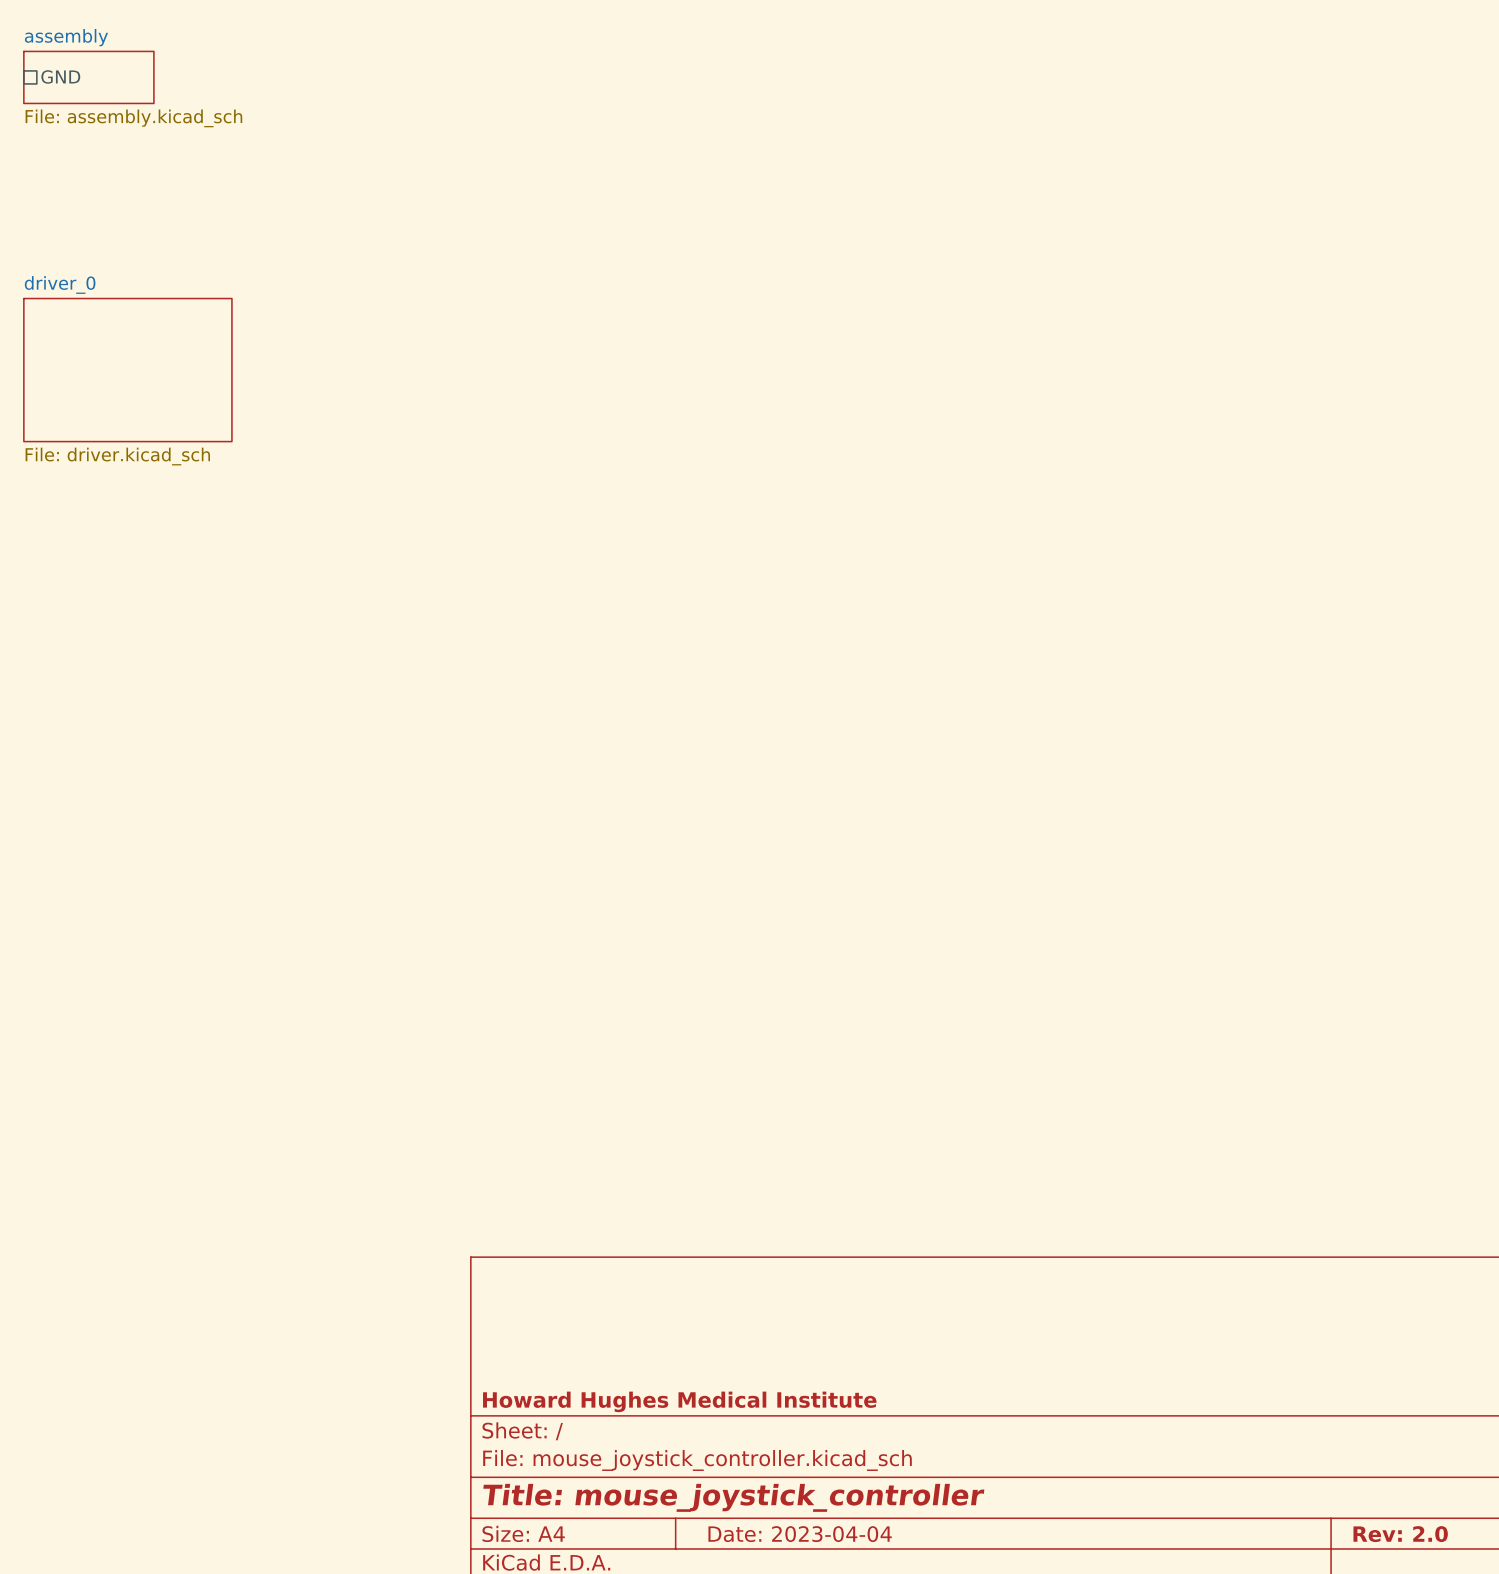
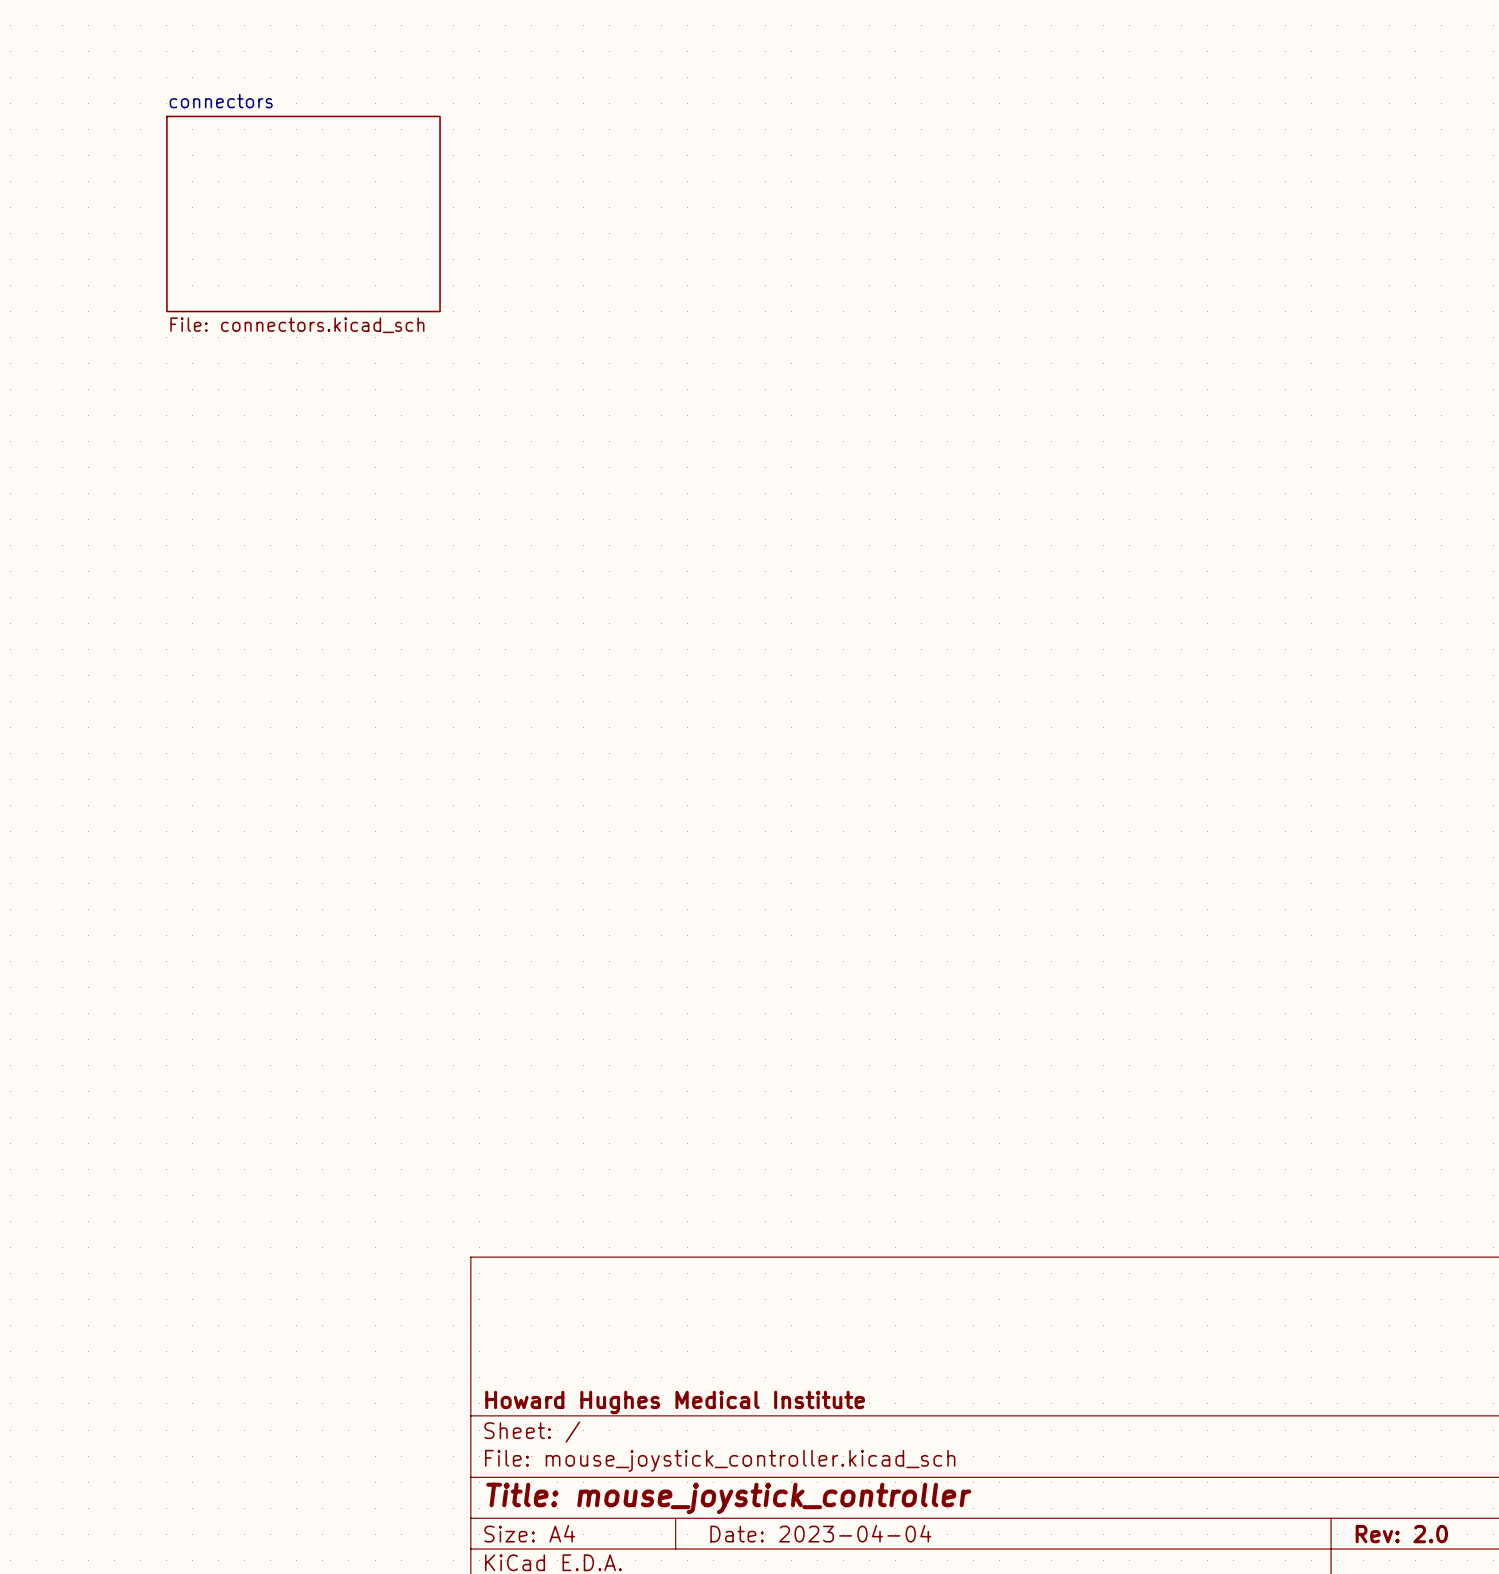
sheet pin: GND (60, 76) -> none
sheet assembly: File: assembly.kicad_sch (88, 77) -> none
sheet connectors: none -> File: connectors.kicad_sch (303, 214)
sheet driver_0: File: driver.kicad_sch (127, 370) -> none

